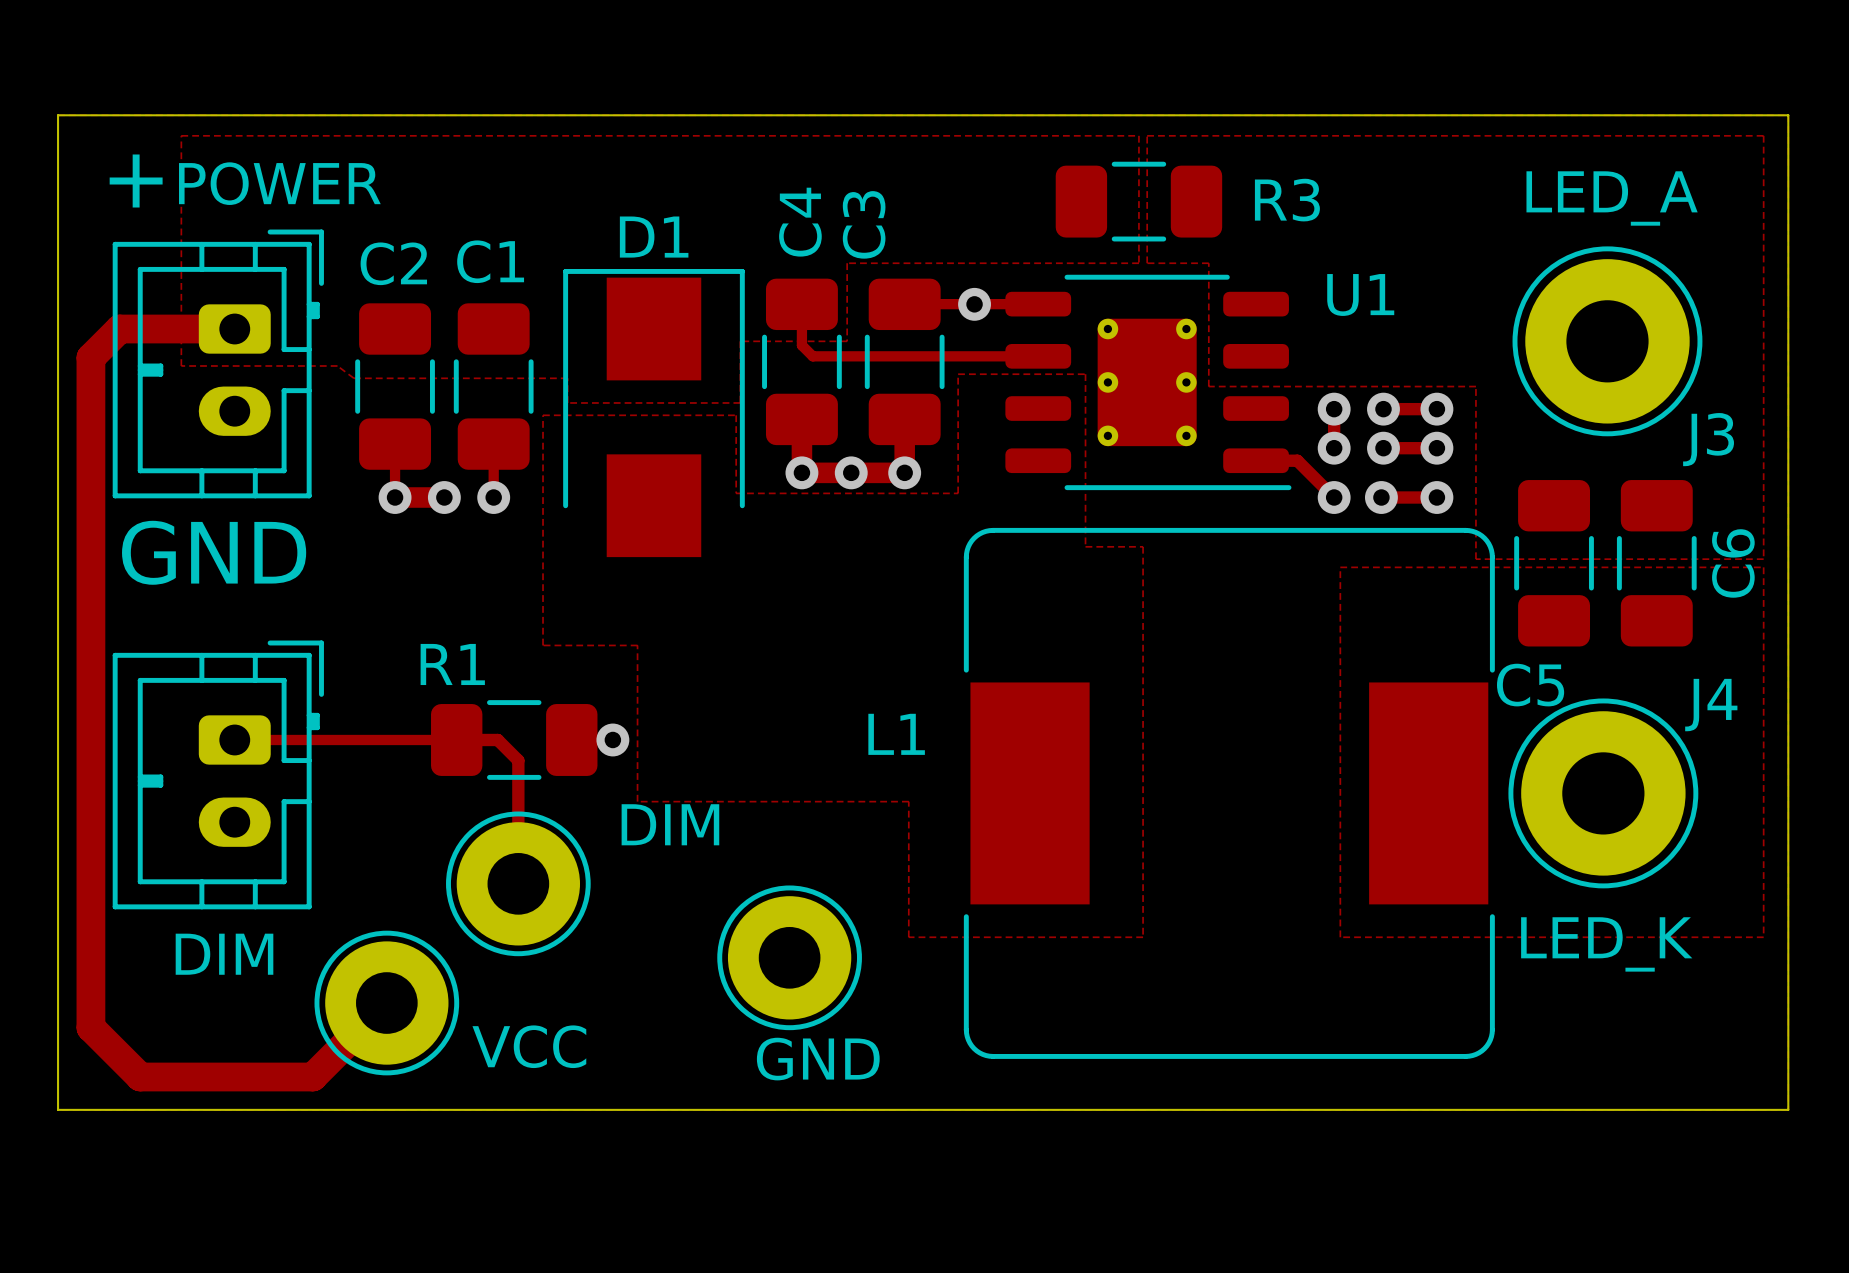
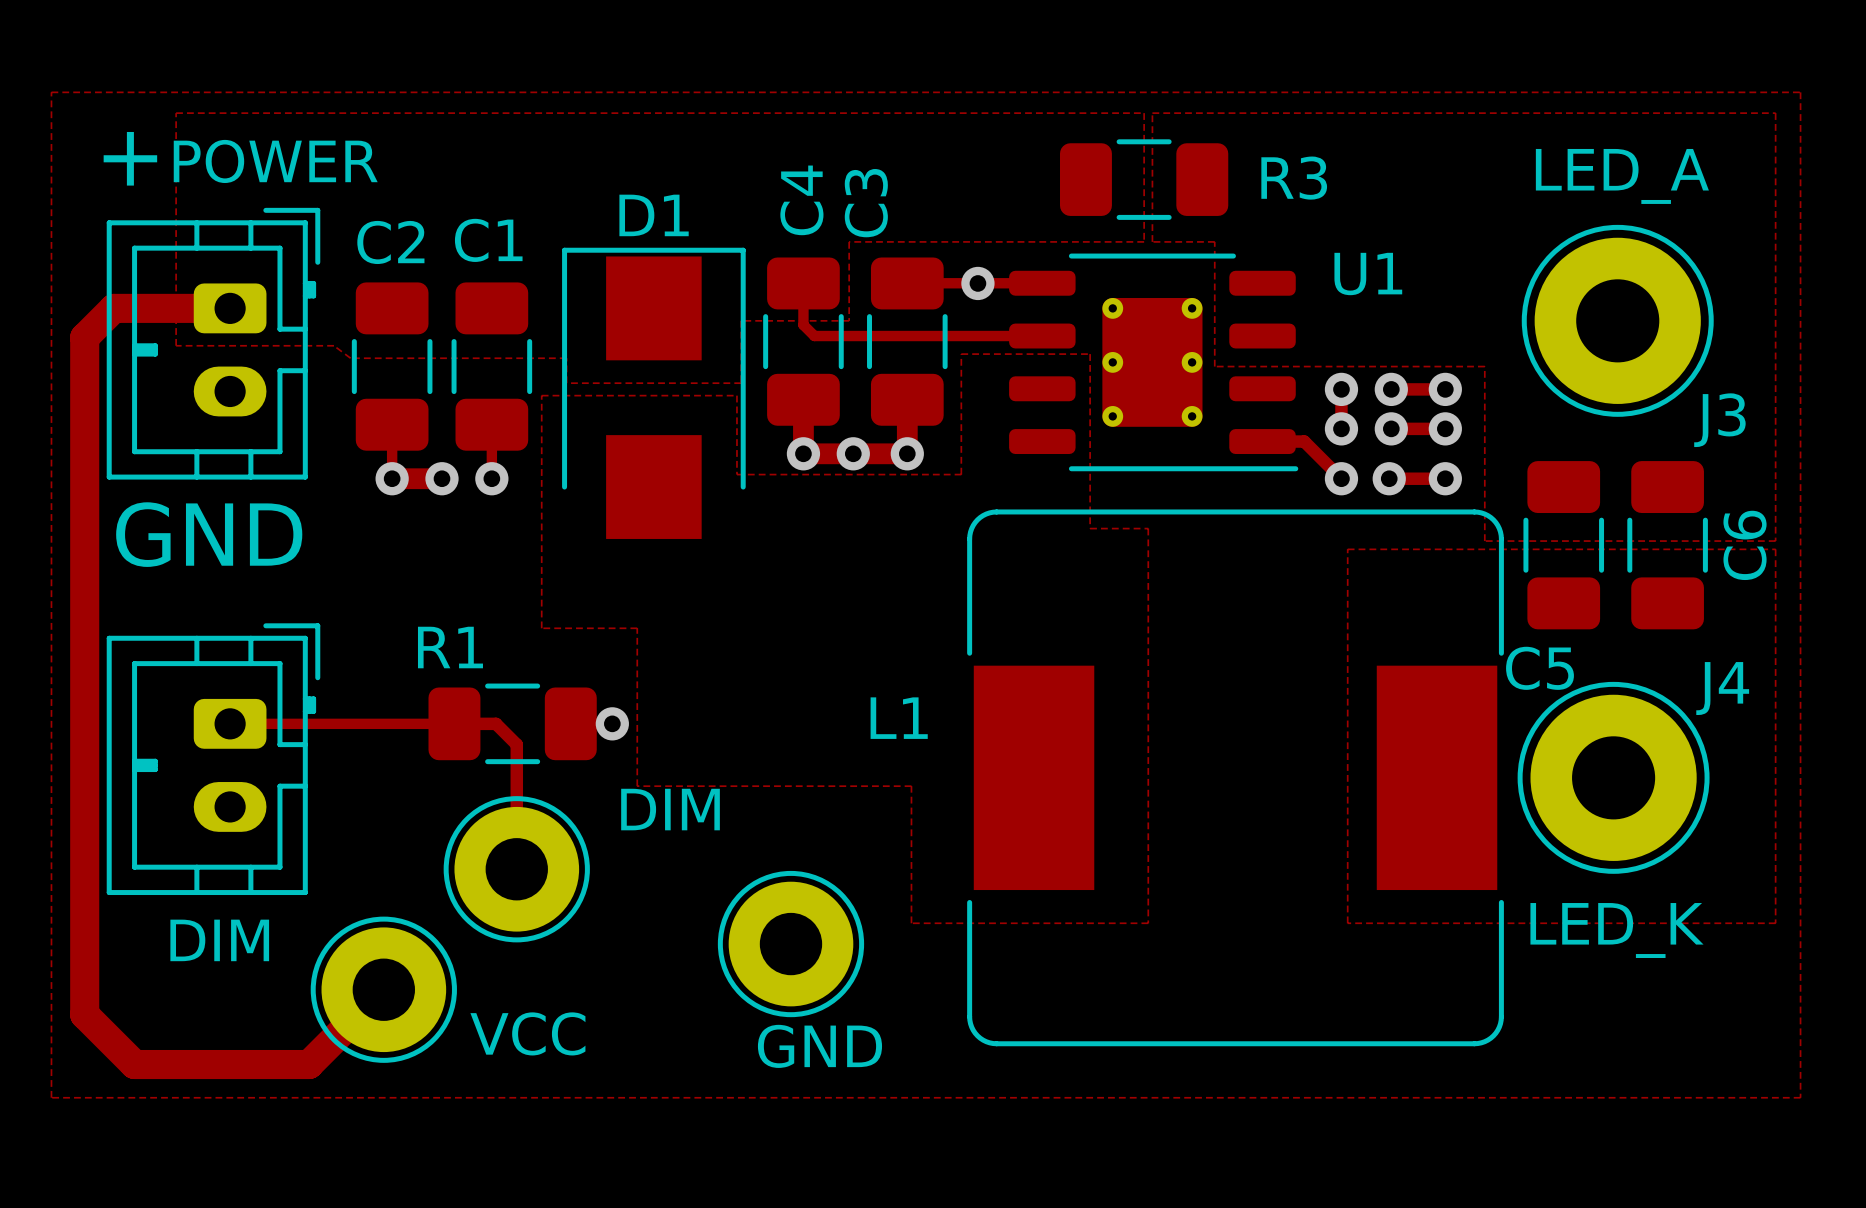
board edge: (58, 115) (1788, 115) (1788, 1109) (58, 1109) (58, 115) -> none

